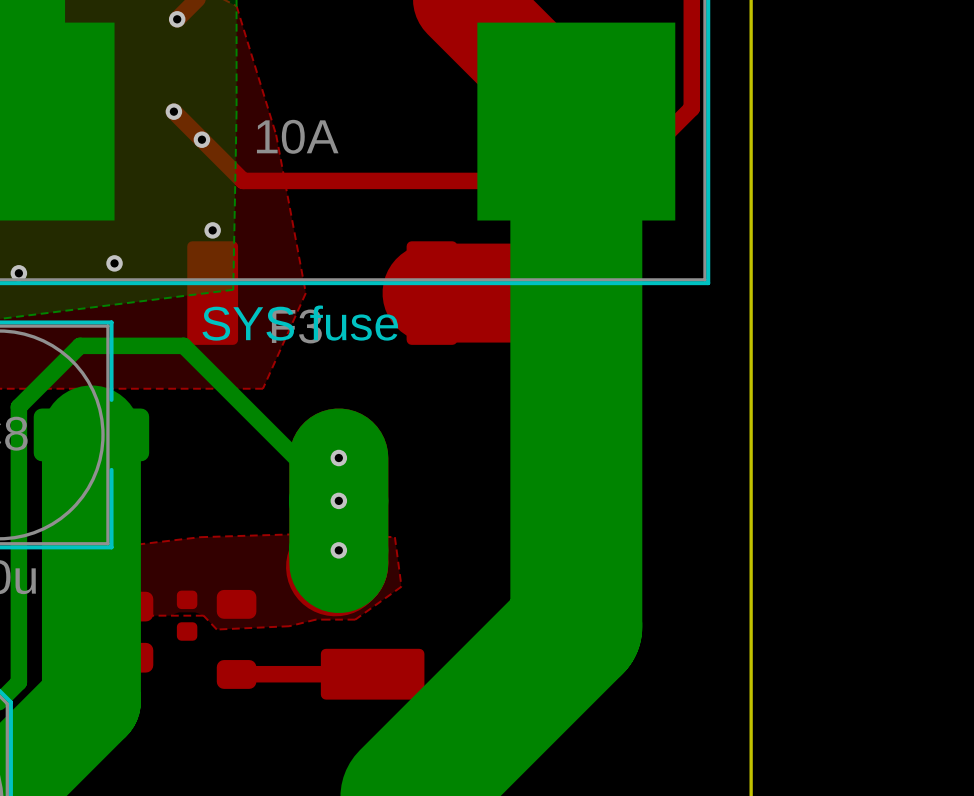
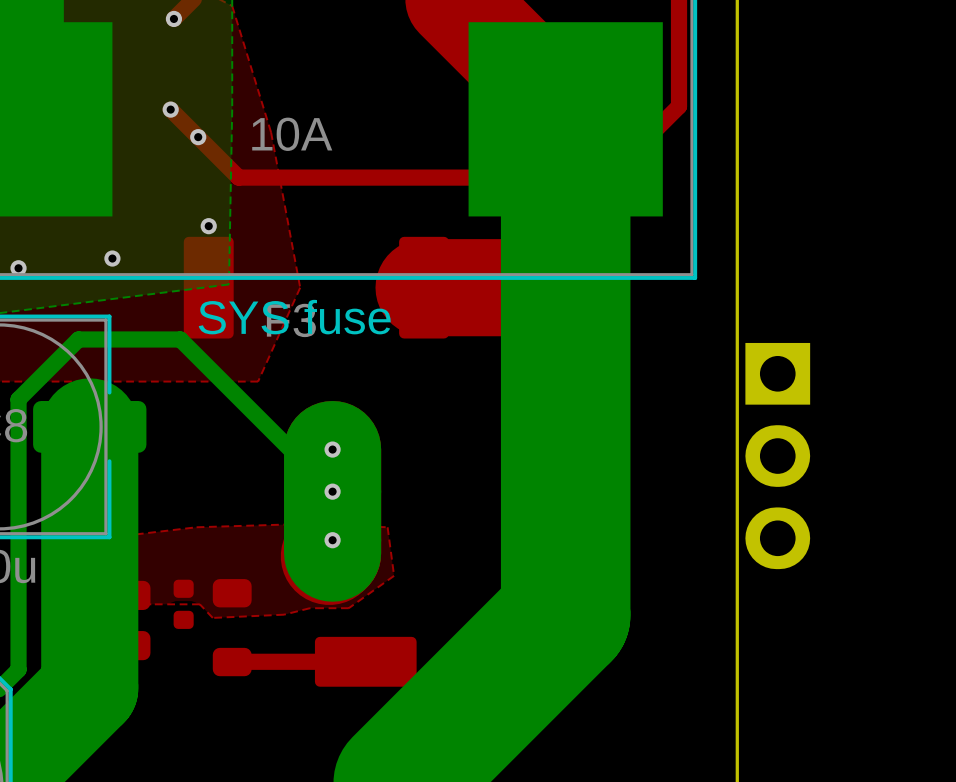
part: none -> (777, 456)

